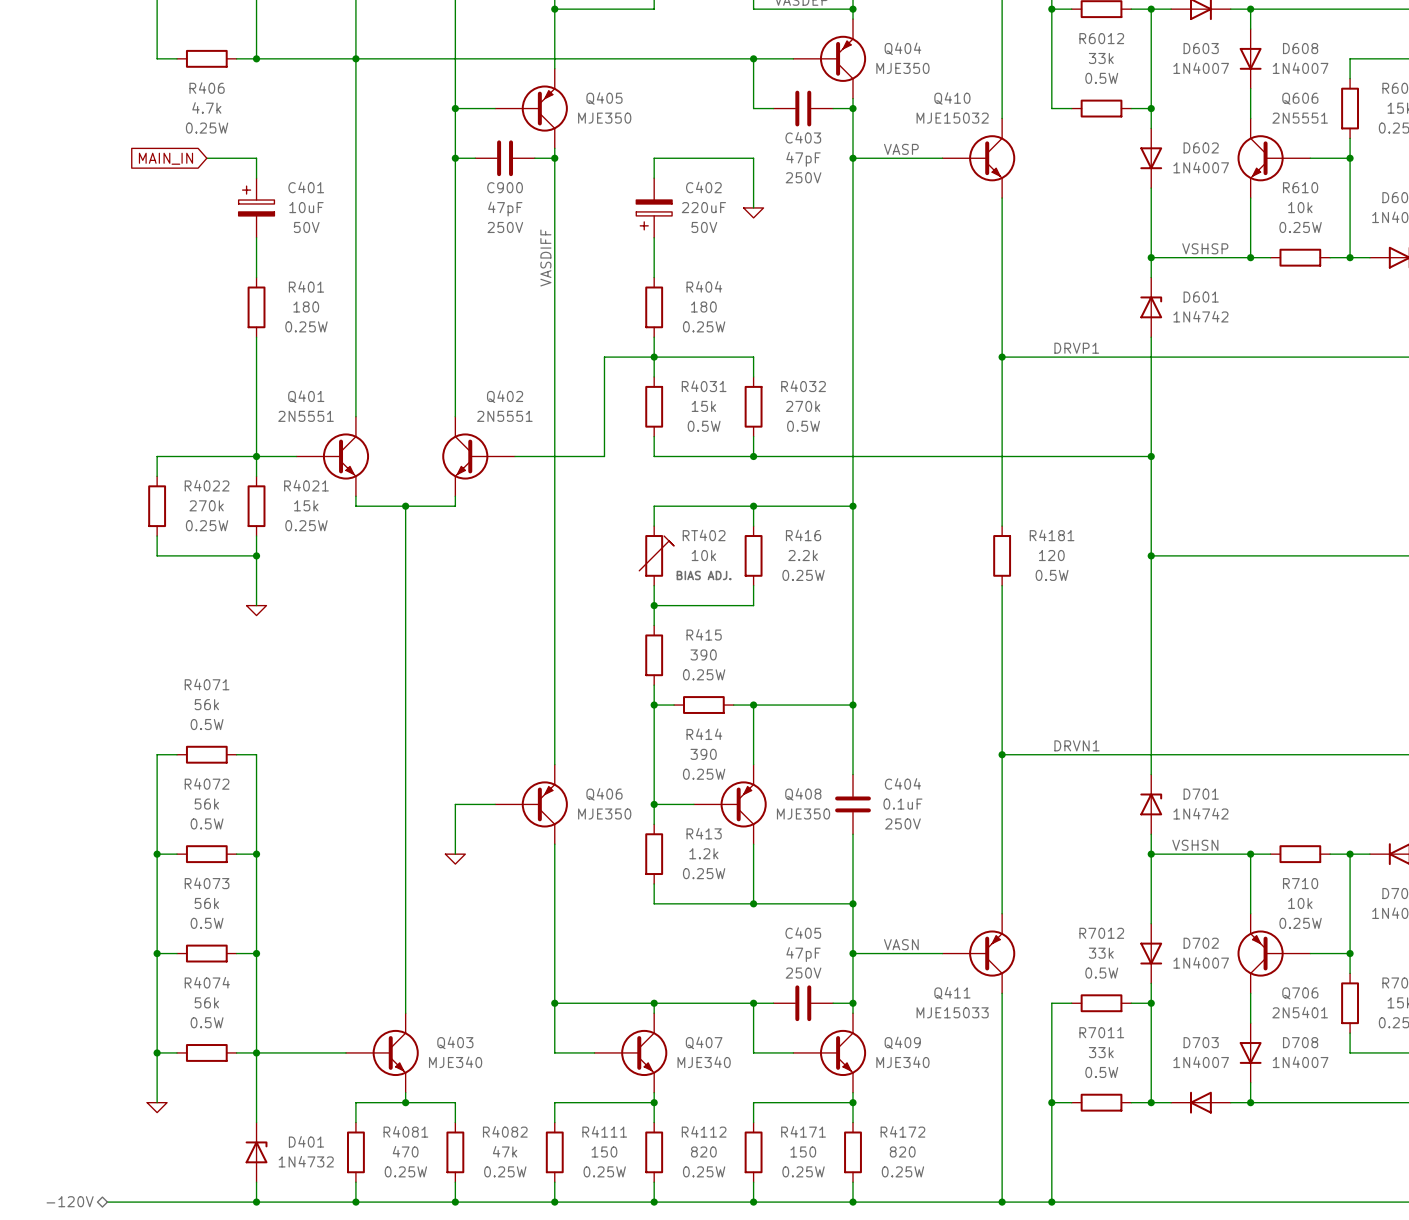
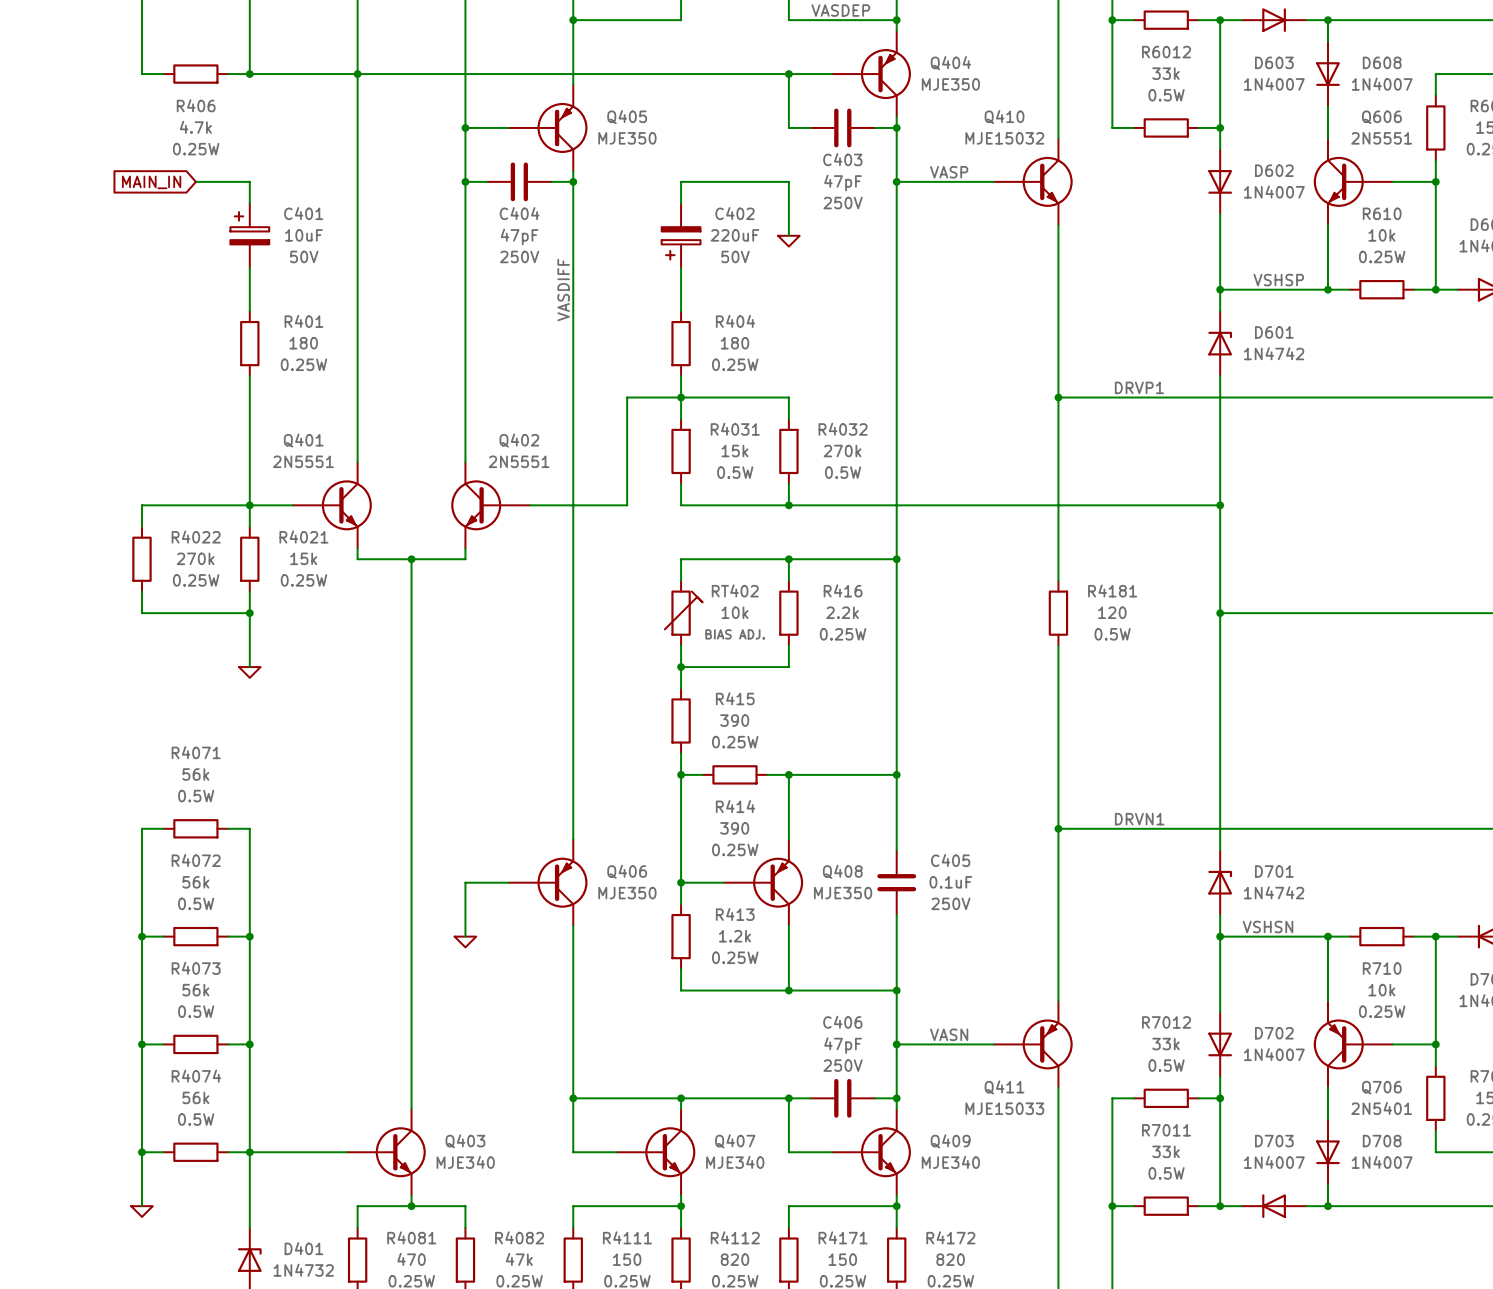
C900 name: C900 (505, 187) -> C404 (519, 213)
C404 name: C404 (902, 783) -> C405 (950, 860)
C405 name: C405 (803, 933) -> C406 (842, 1022)

